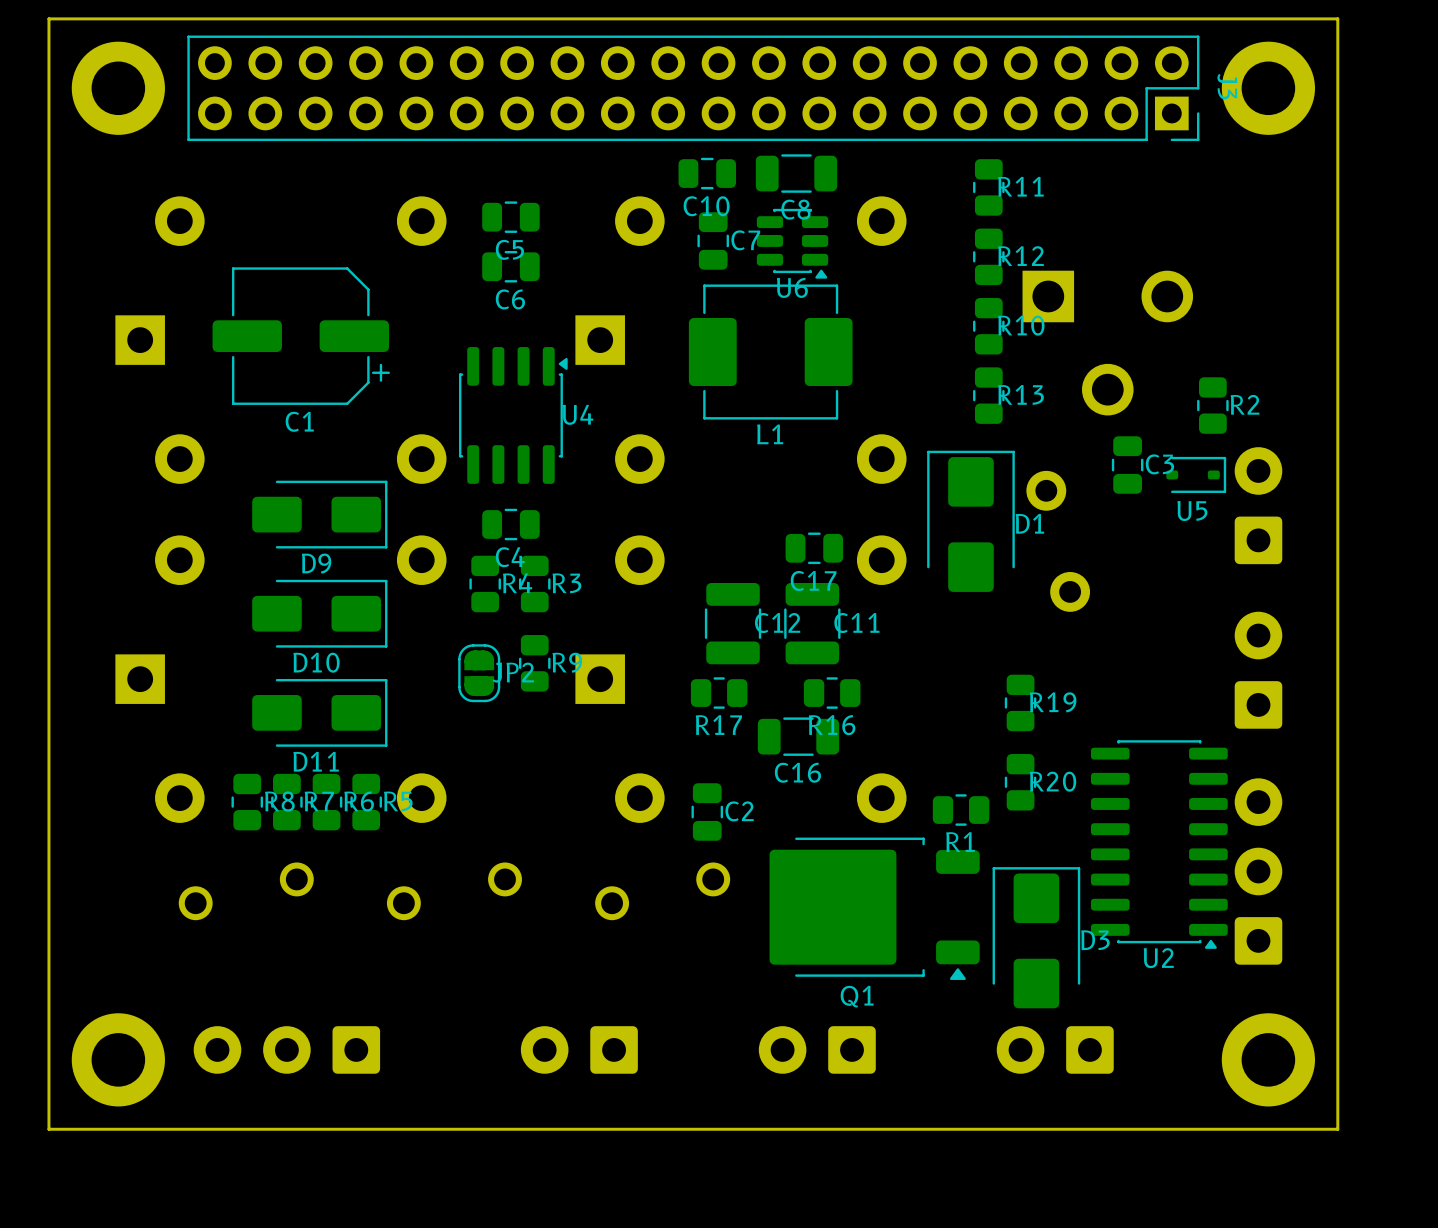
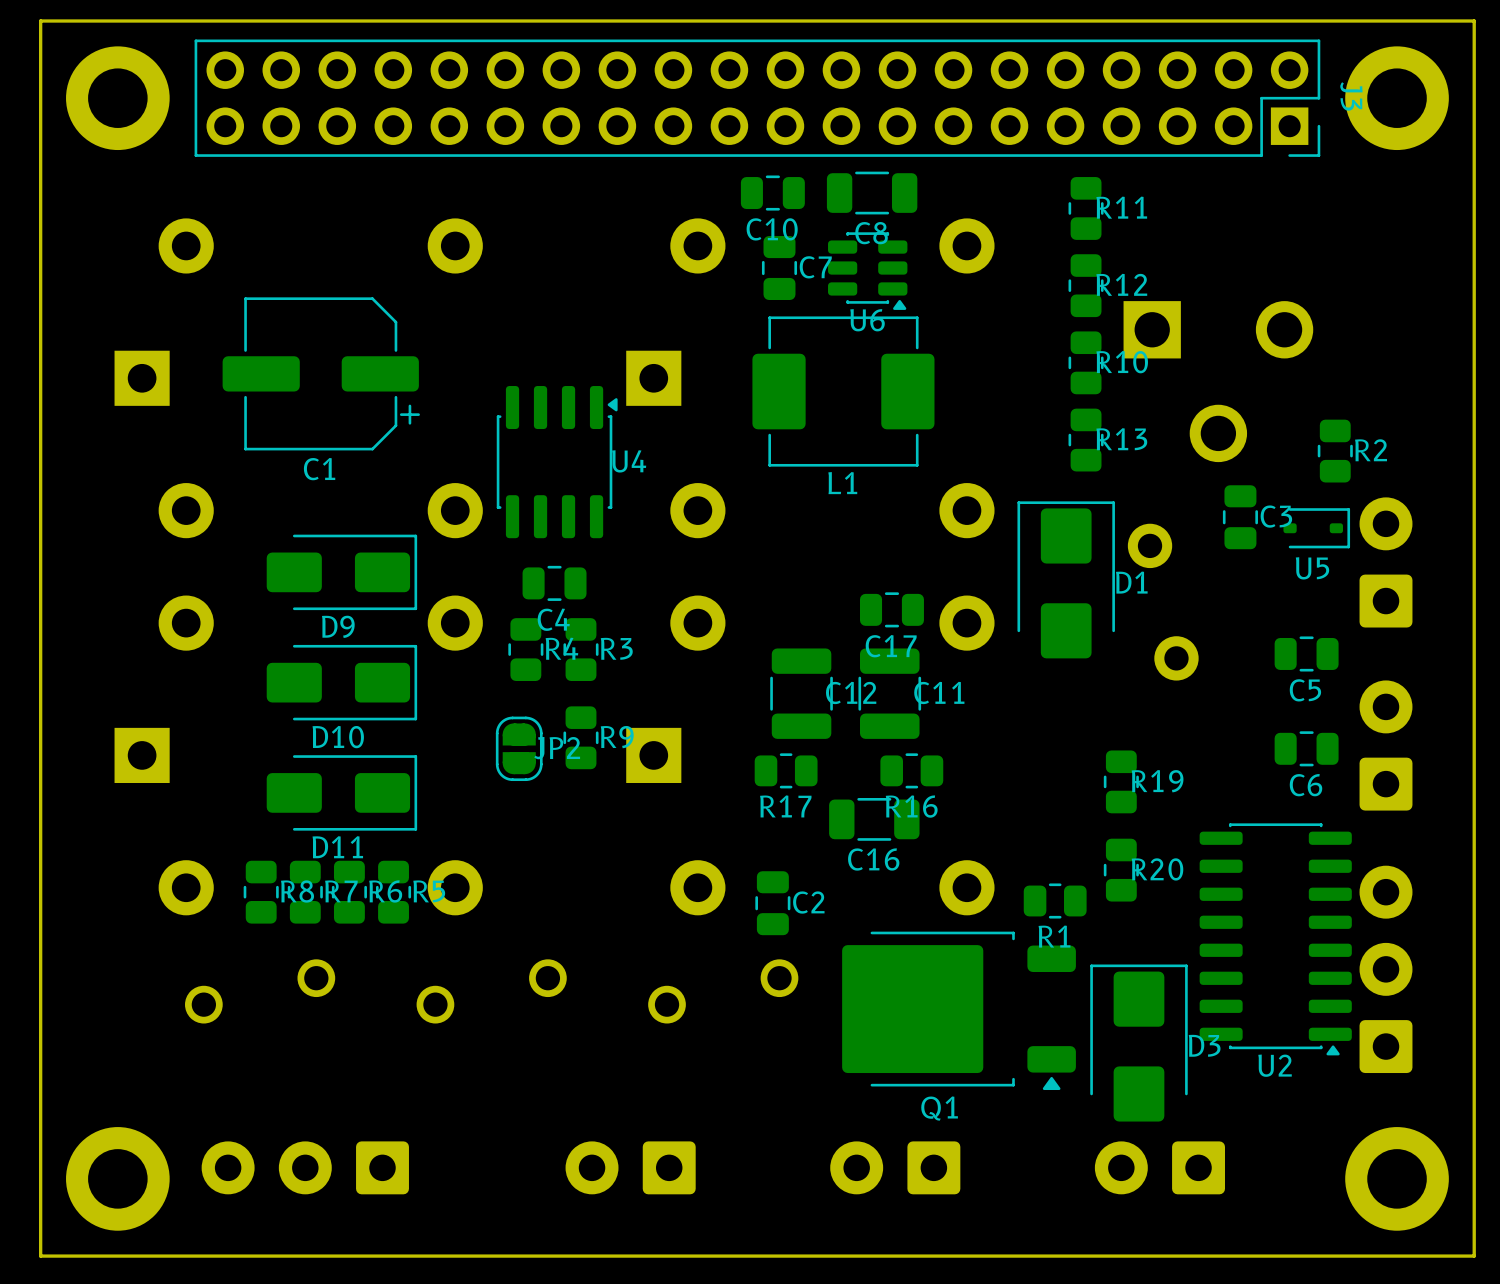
C5 position: (510, 217) -> (1306, 653)
C6 position: (510, 266) -> (1306, 748)

